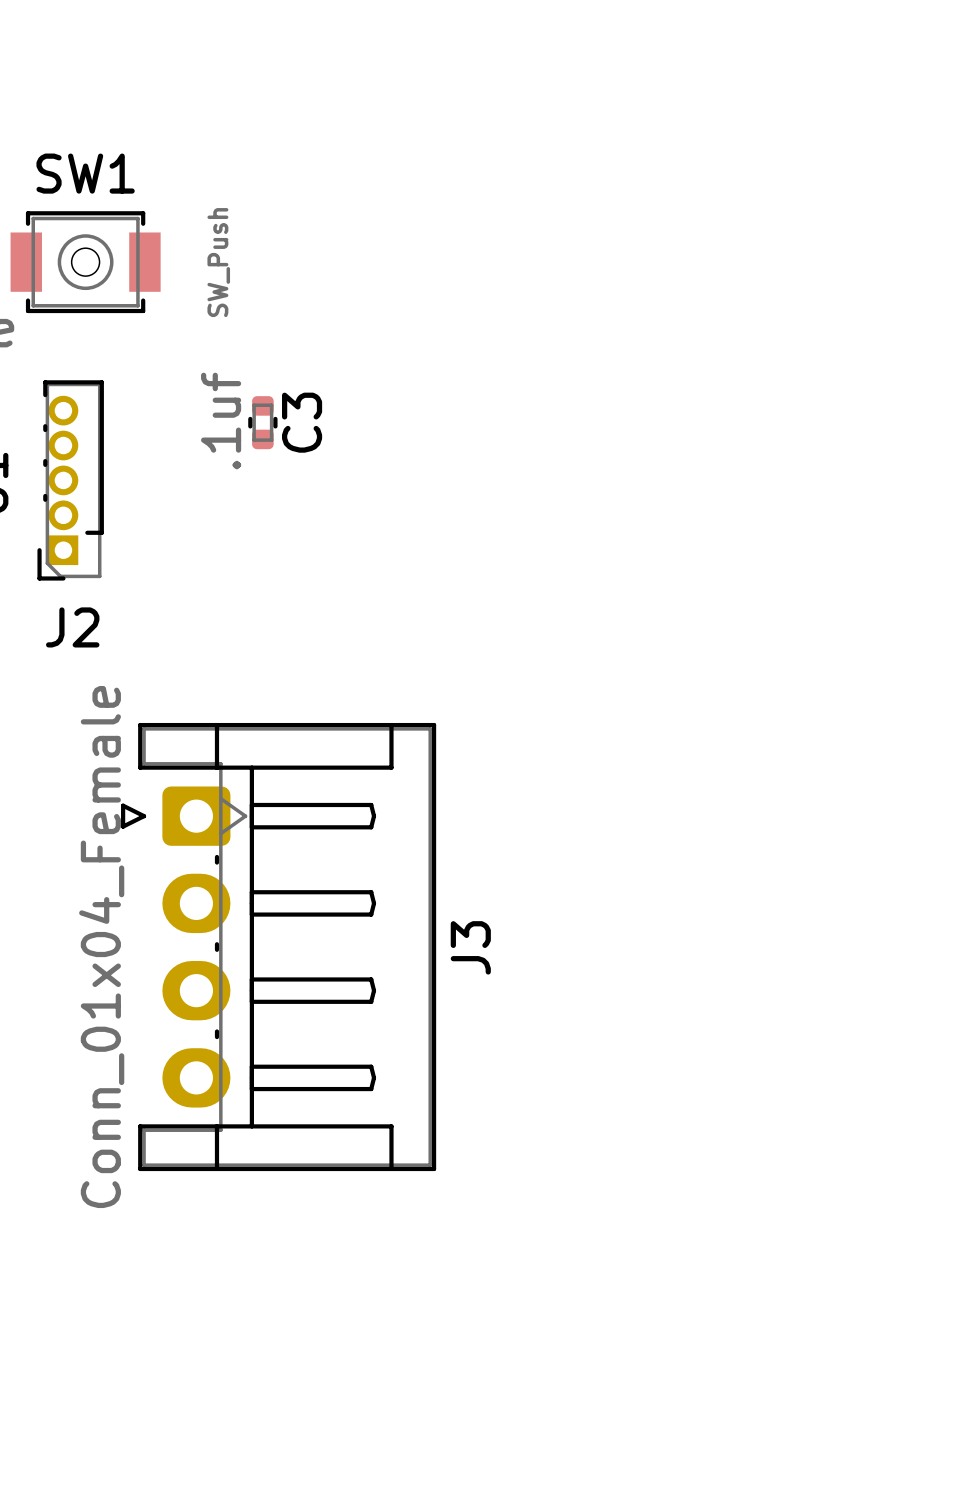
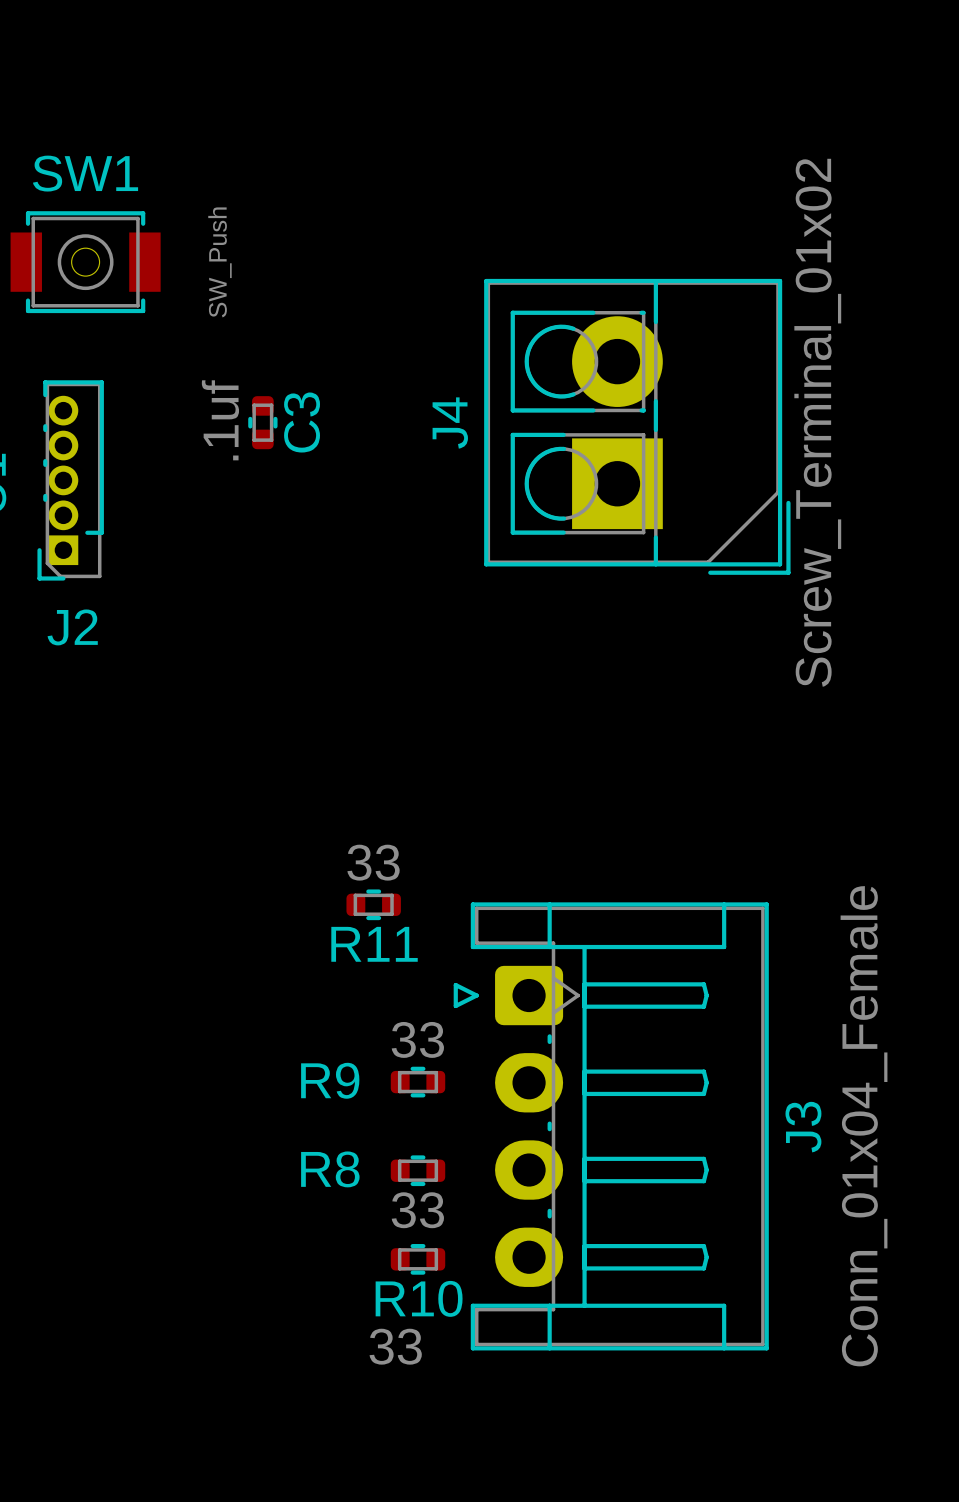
J4: none -> Screw_Terminal_01x02 (637, 426)
R11: none -> 33 (373, 904)
J3 value position: Conn_01x04_Female (101, 947) -> Conn_01x04_Female (864, 1126)
J3 position: (278, 947) -> (611, 1126)
R9: none -> 33 (418, 1082)
R8: none -> 33 (418, 1170)
R10: none -> 33 (418, 1259)

